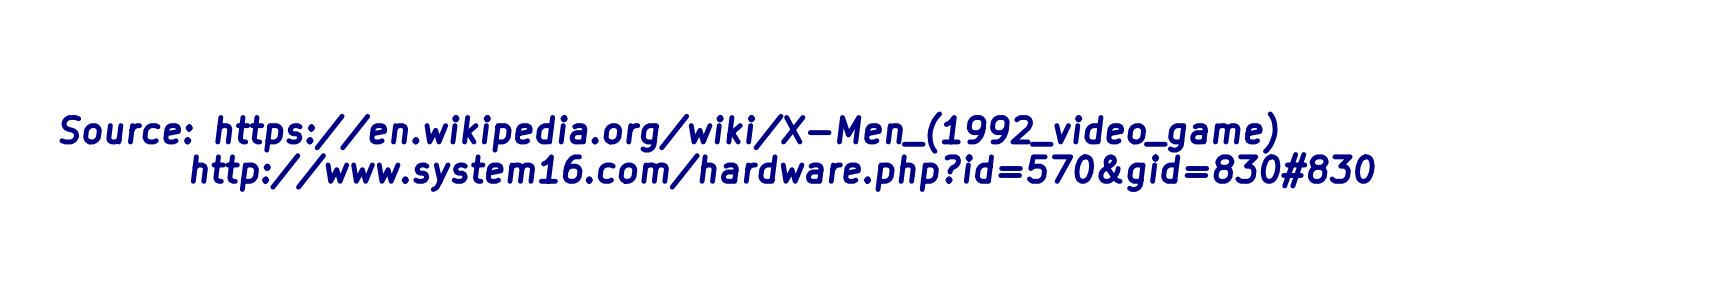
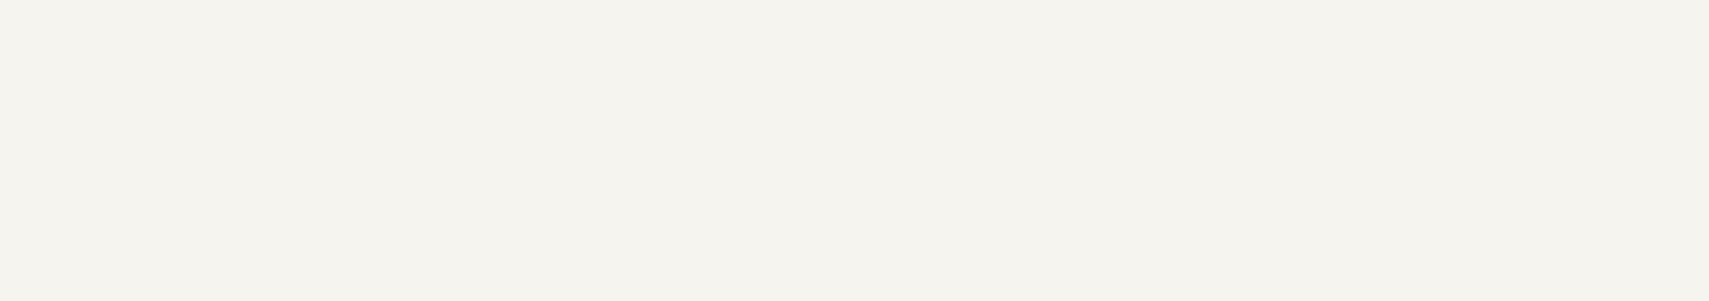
text: Source: https://en.wikipedia.org/wiki/X-Men_(1992_video_game) (668, 132) -> none
text: http://www.system16.com/hardware.php?id=570&gid=830#830 (782, 171) -> none

